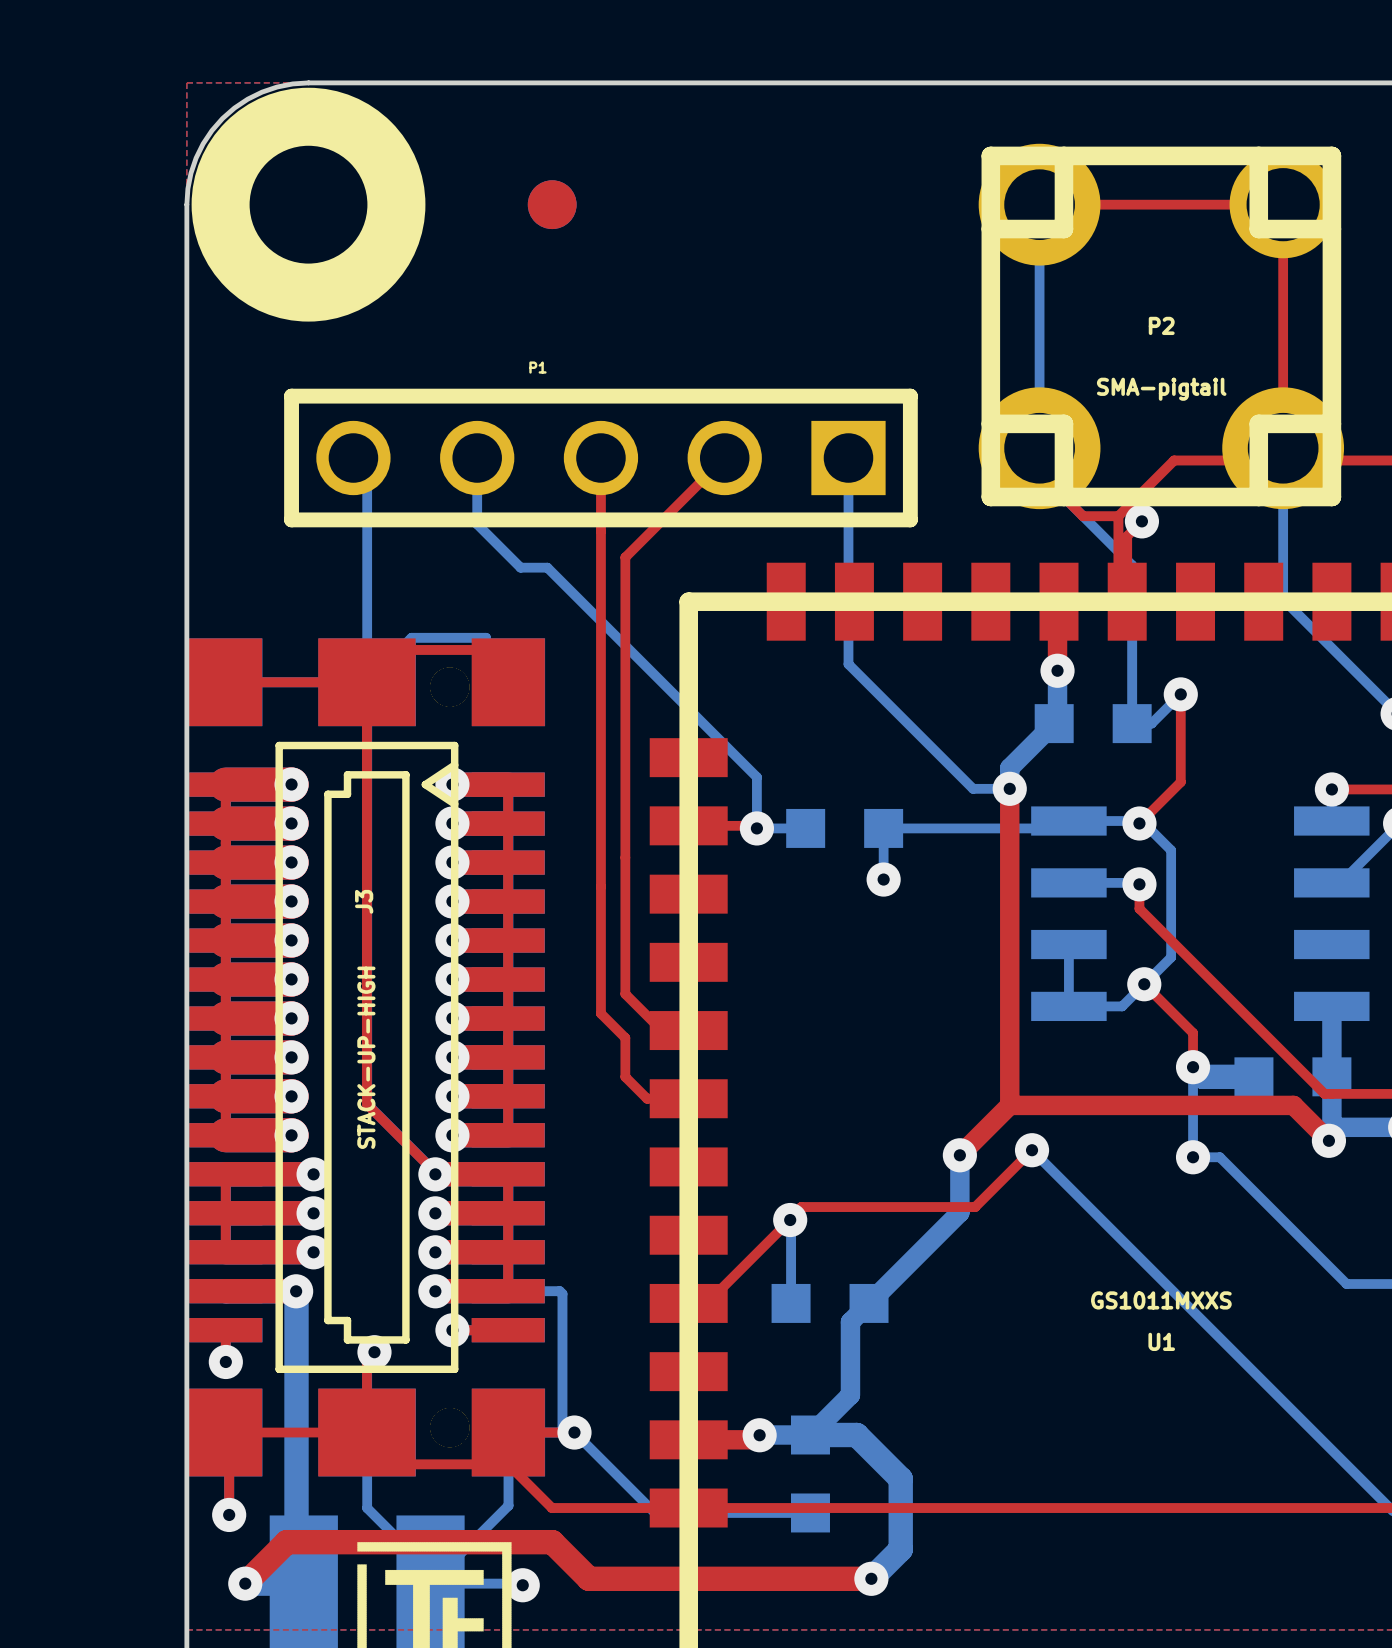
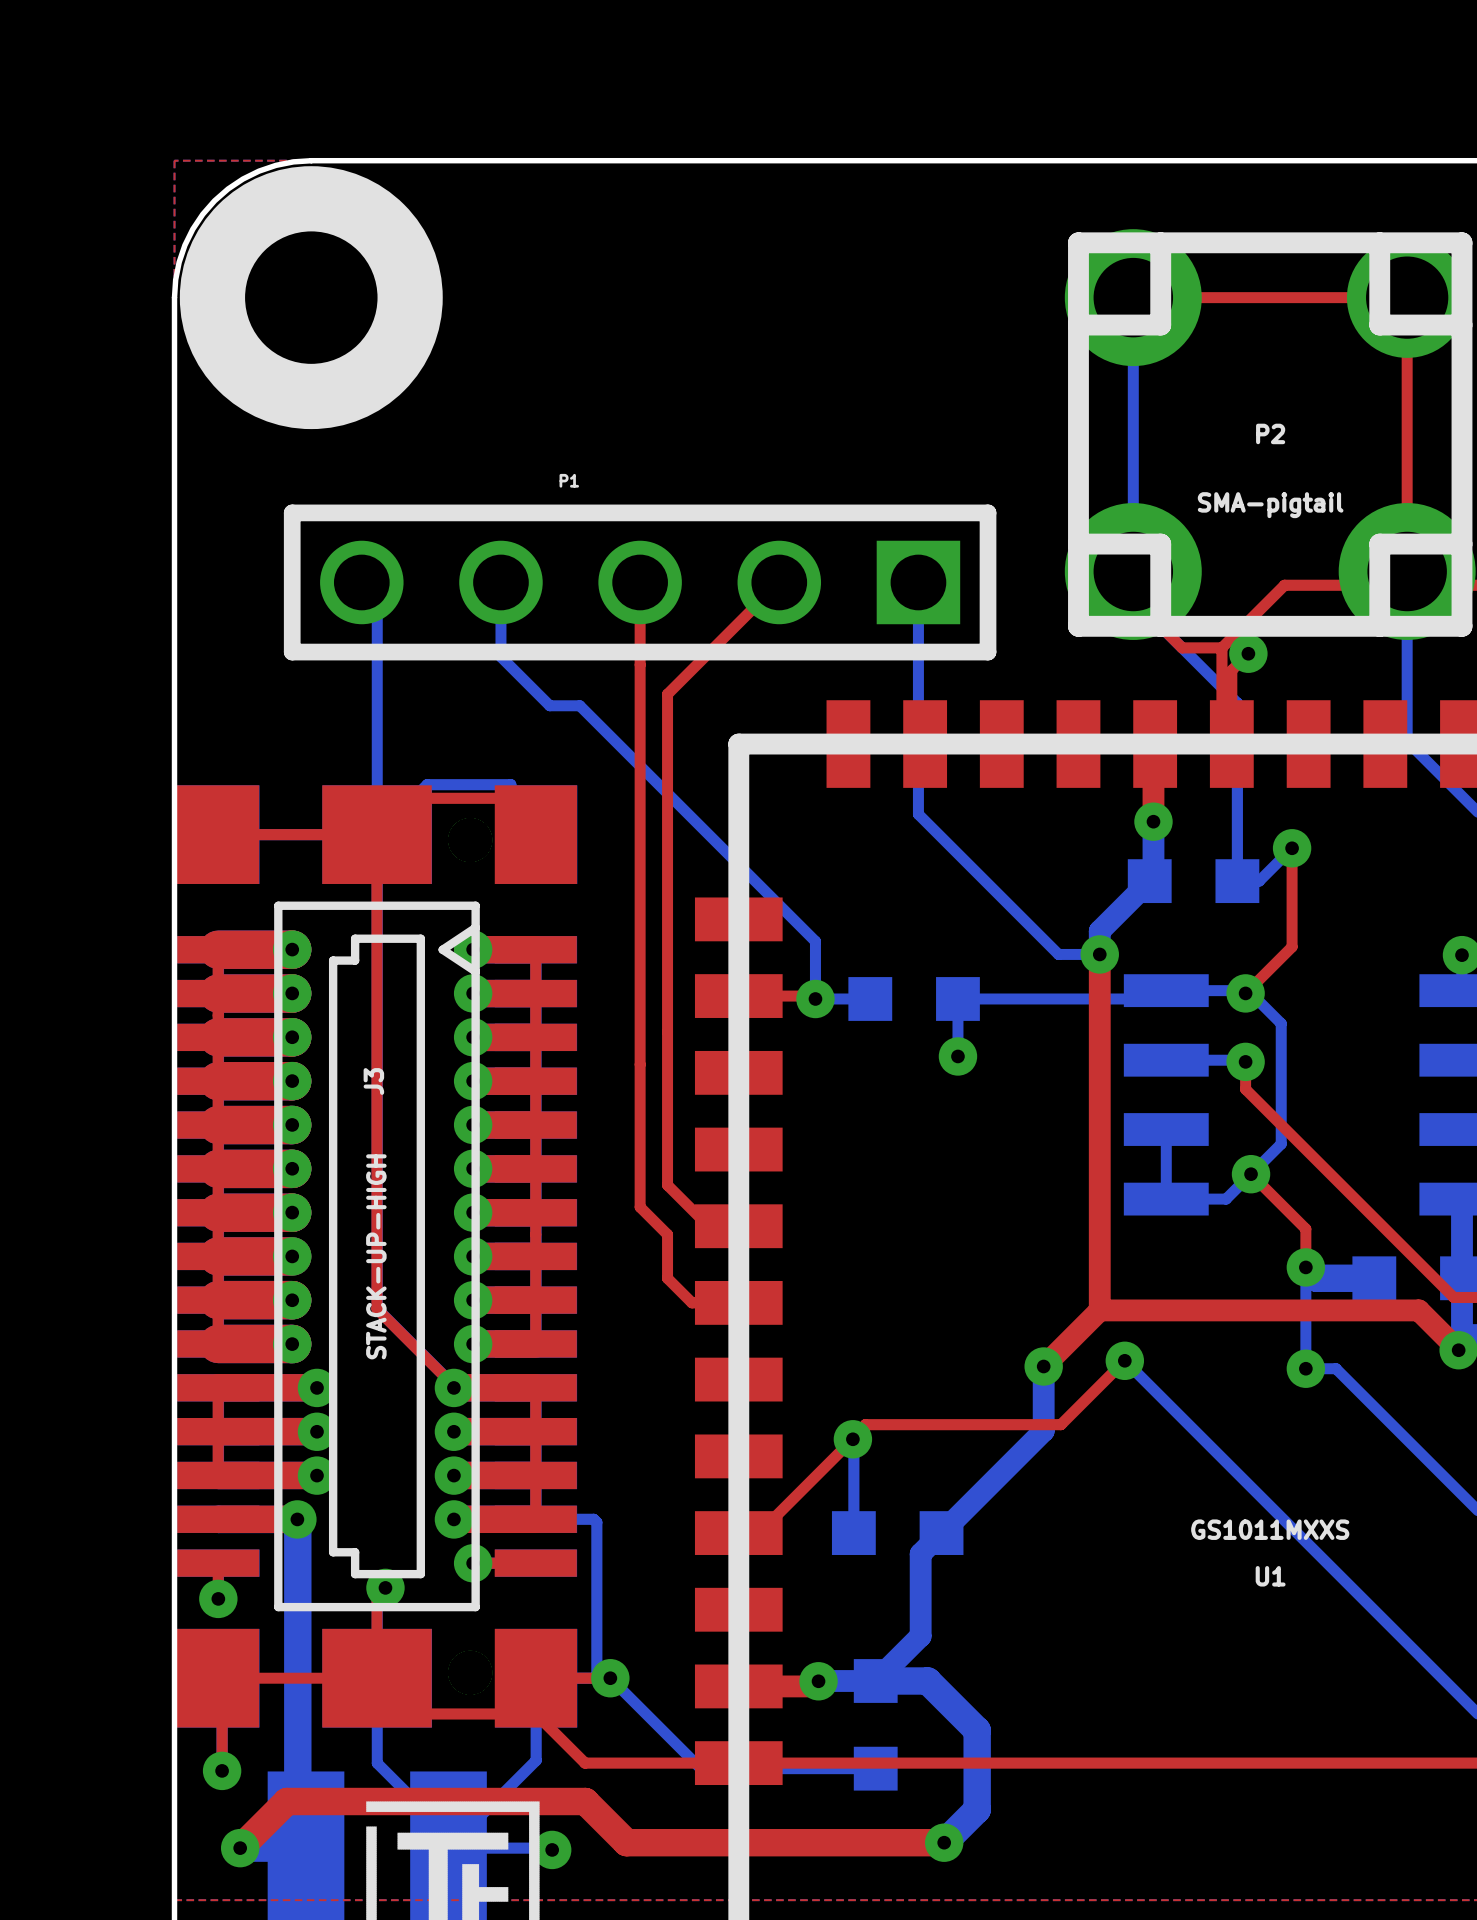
part: (552, 204) -> none

